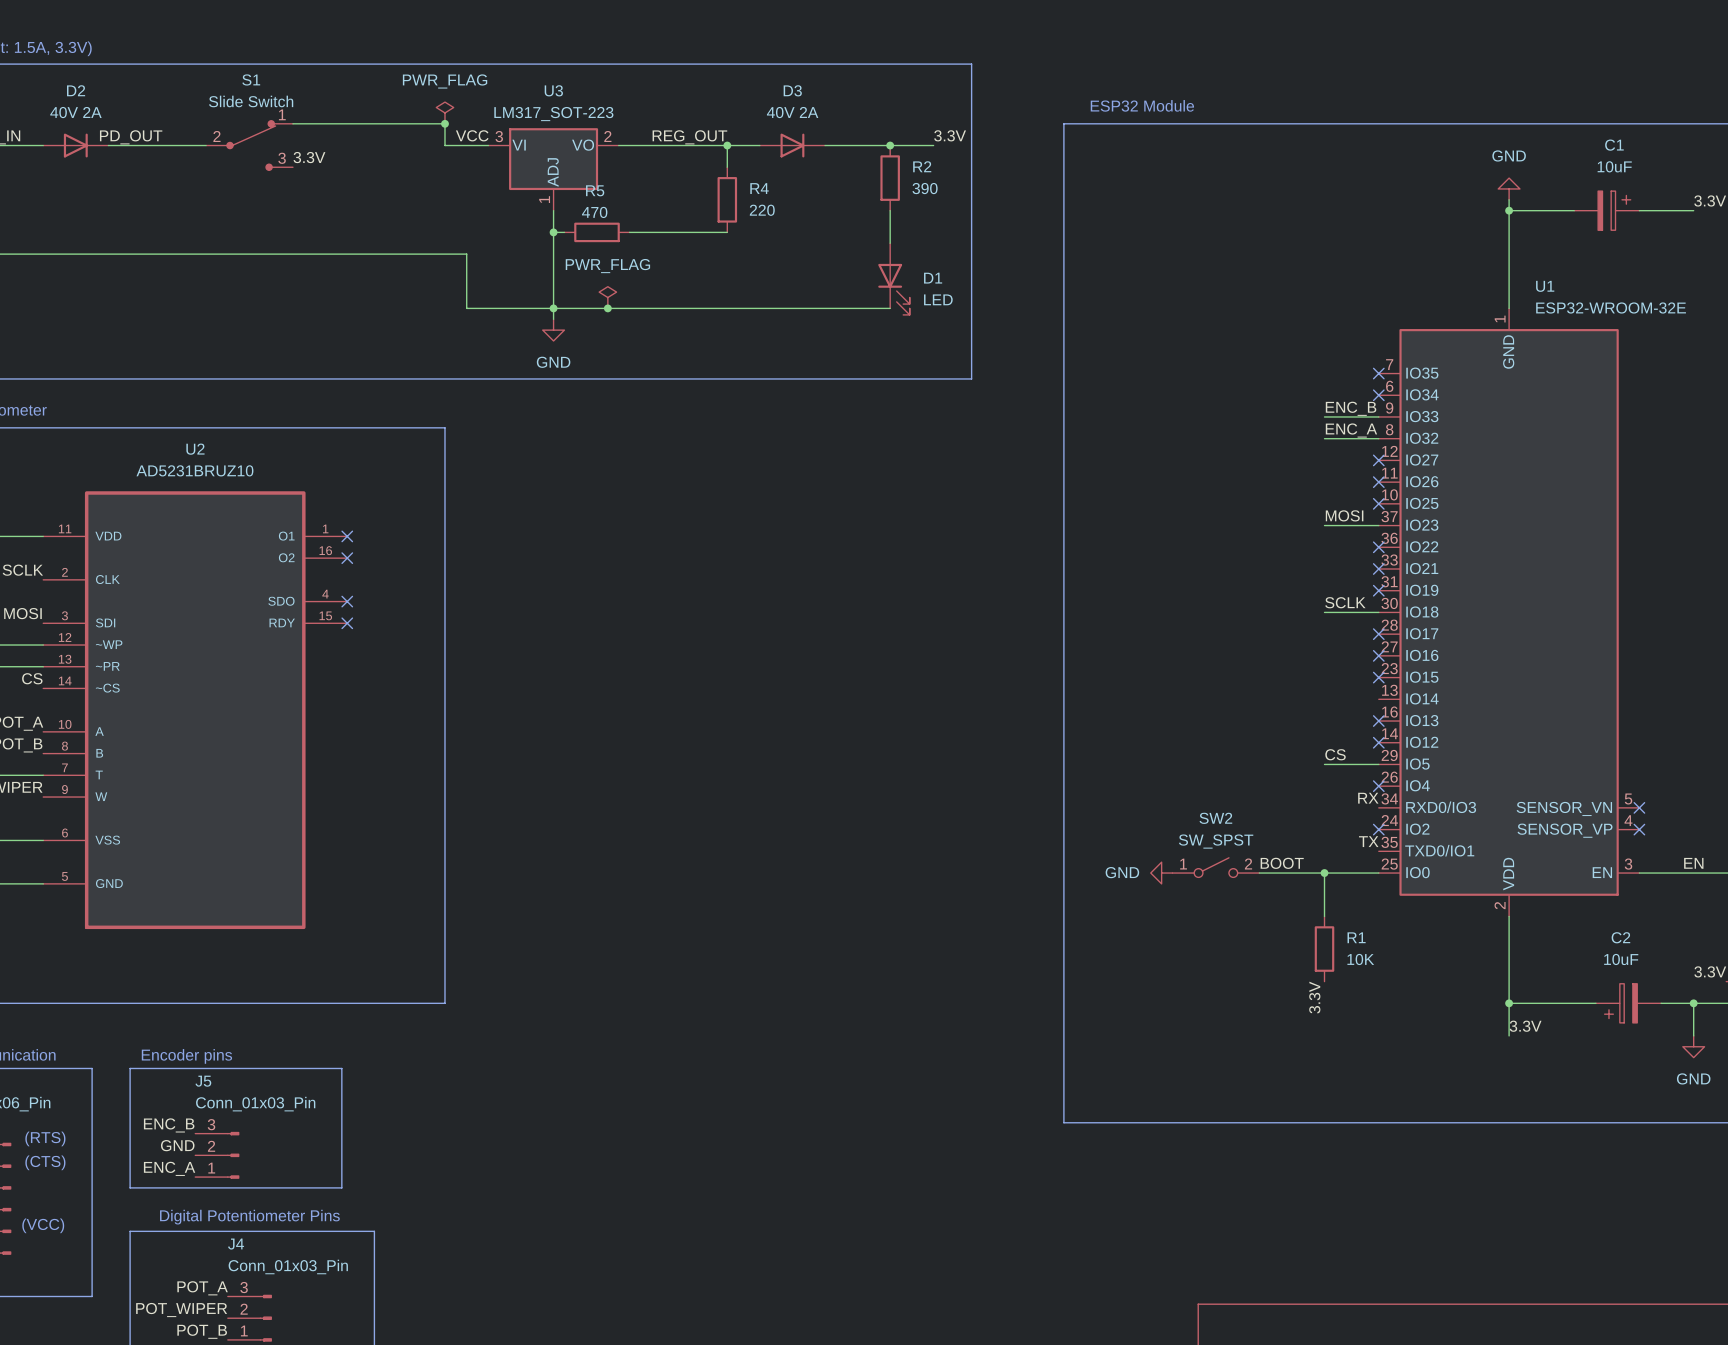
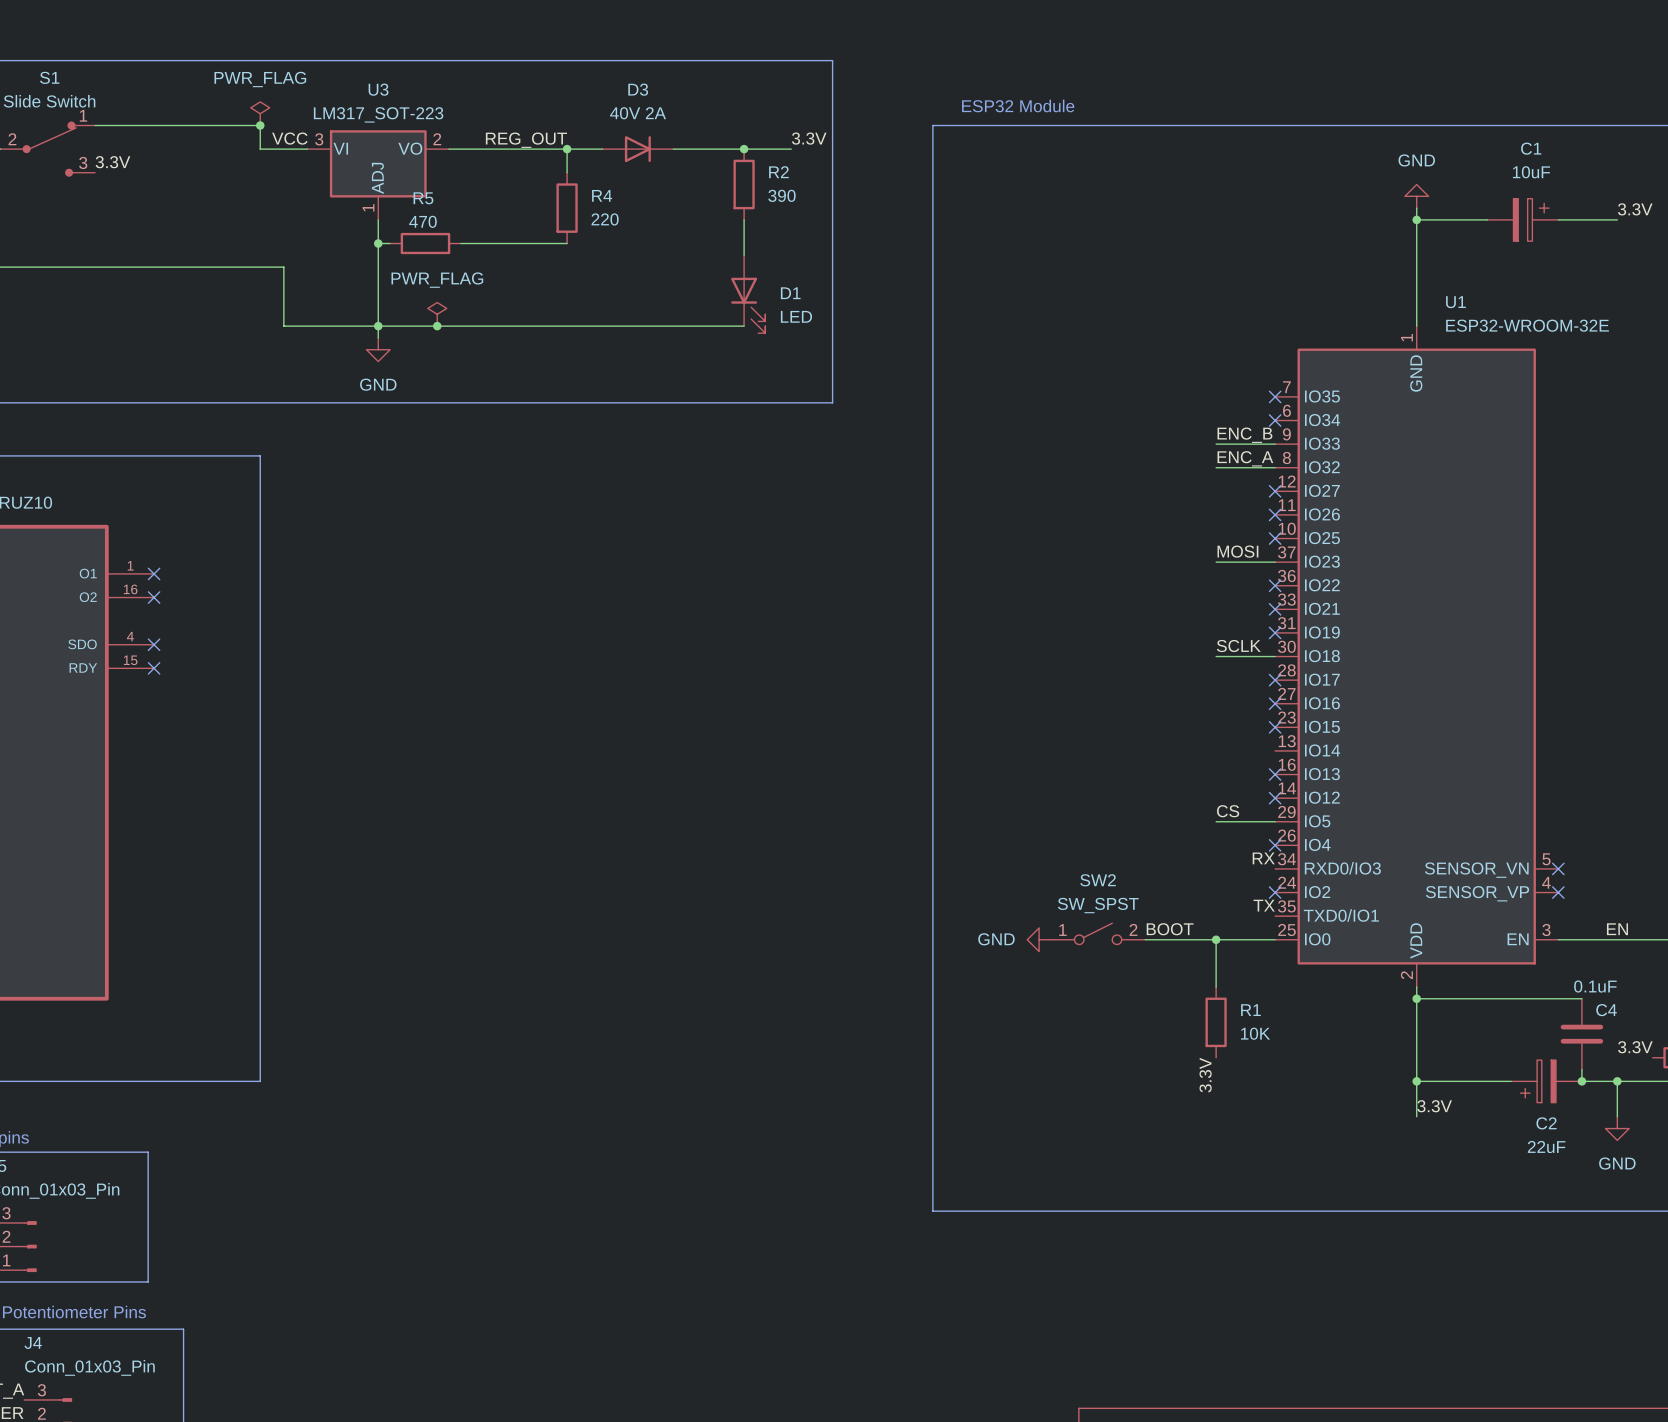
wire: none -> (1416, 998) (1581, 998)
junction: none -> (1416, 998)
C2 name position: C2 (1620, 937) -> C2 (1546, 1123)
C2 value: 10uF (1621, 959) -> 22uF (1546, 1147)
C4: none -> 0.1uF (1581, 1034)
wire: none -> (1581, 1069) (1581, 1081)
junction: none -> (1581, 1081)

